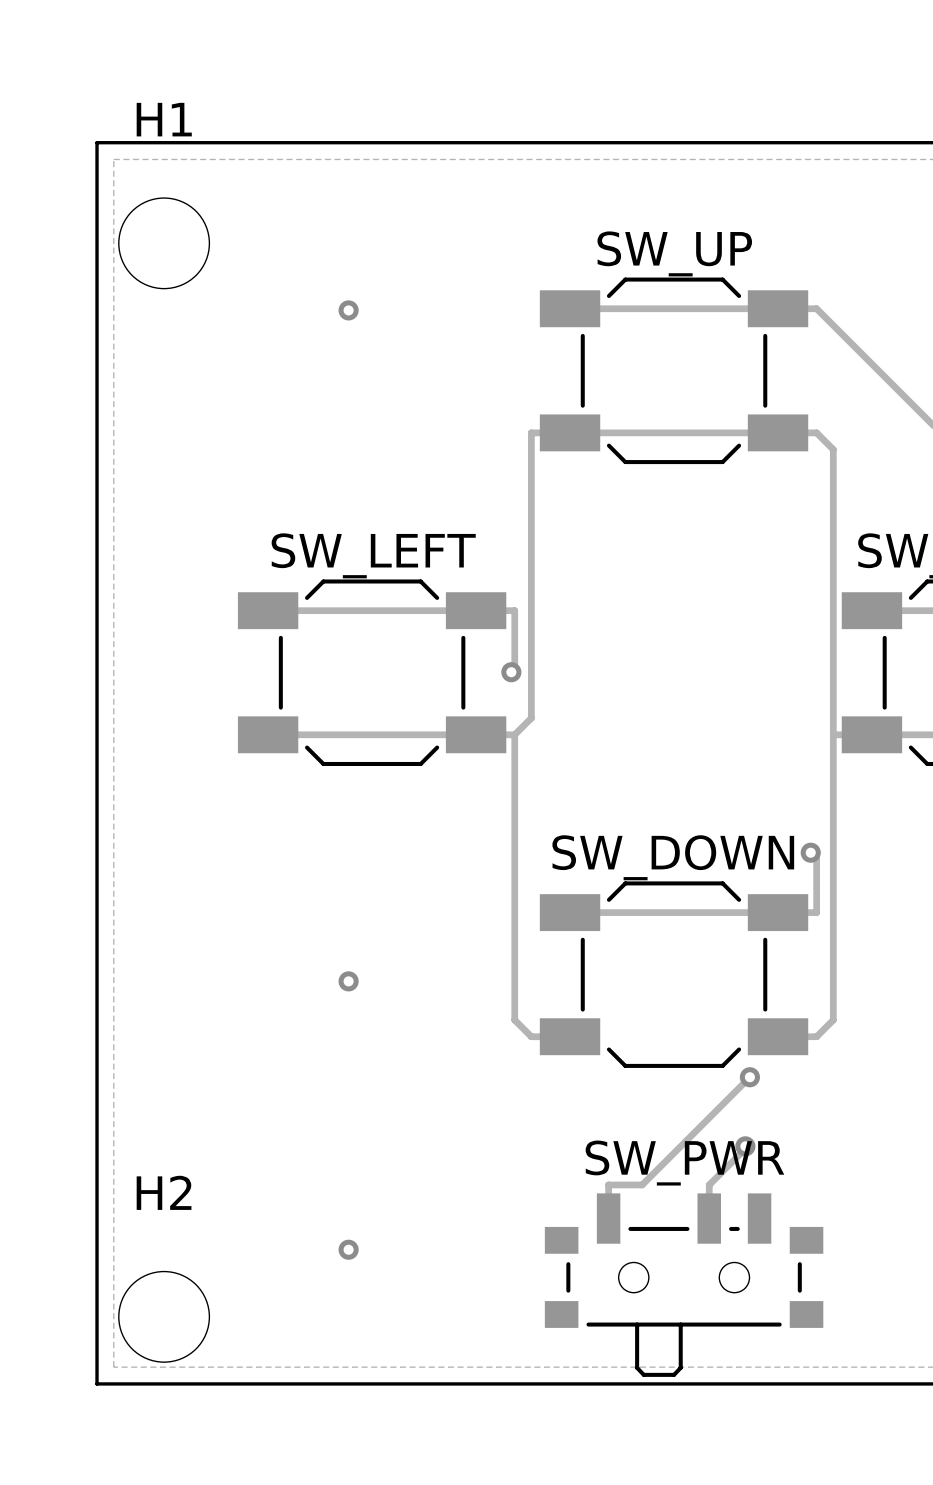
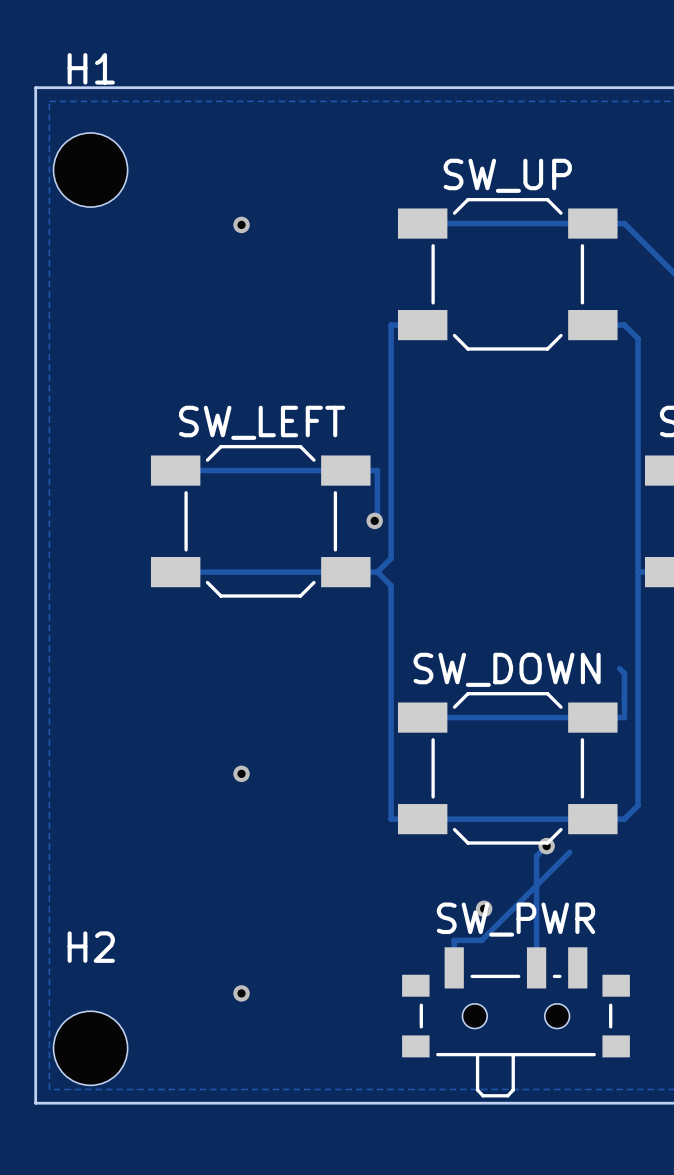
track: (570, 432) (778, 432) -> (422, 819) (592, 819)
track: (514, 734) (514, 1020) (531, 1036) -> (377, 572) (391, 585) (391, 819)
via: (810, 852) -> none
via position: (749, 1077) -> (546, 846)
via: none -> (484, 908)
track: (745, 1146) (745, 1148) (709, 1184) -> (546, 846) (536, 856) (536, 940)
via: (745, 1146) -> none

